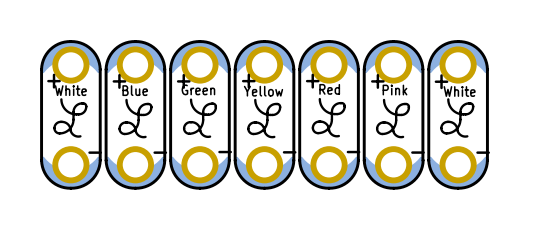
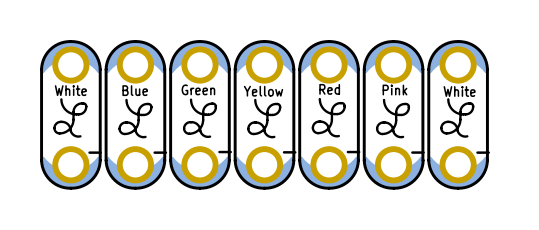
text: + (54, 81) -> none
text: + (119, 81) -> none
text: + (183, 81) -> none
text: + (248, 81) -> none
text: + (312, 81) -> none
text: + (377, 81) -> none
text: + (441, 81) -> none

